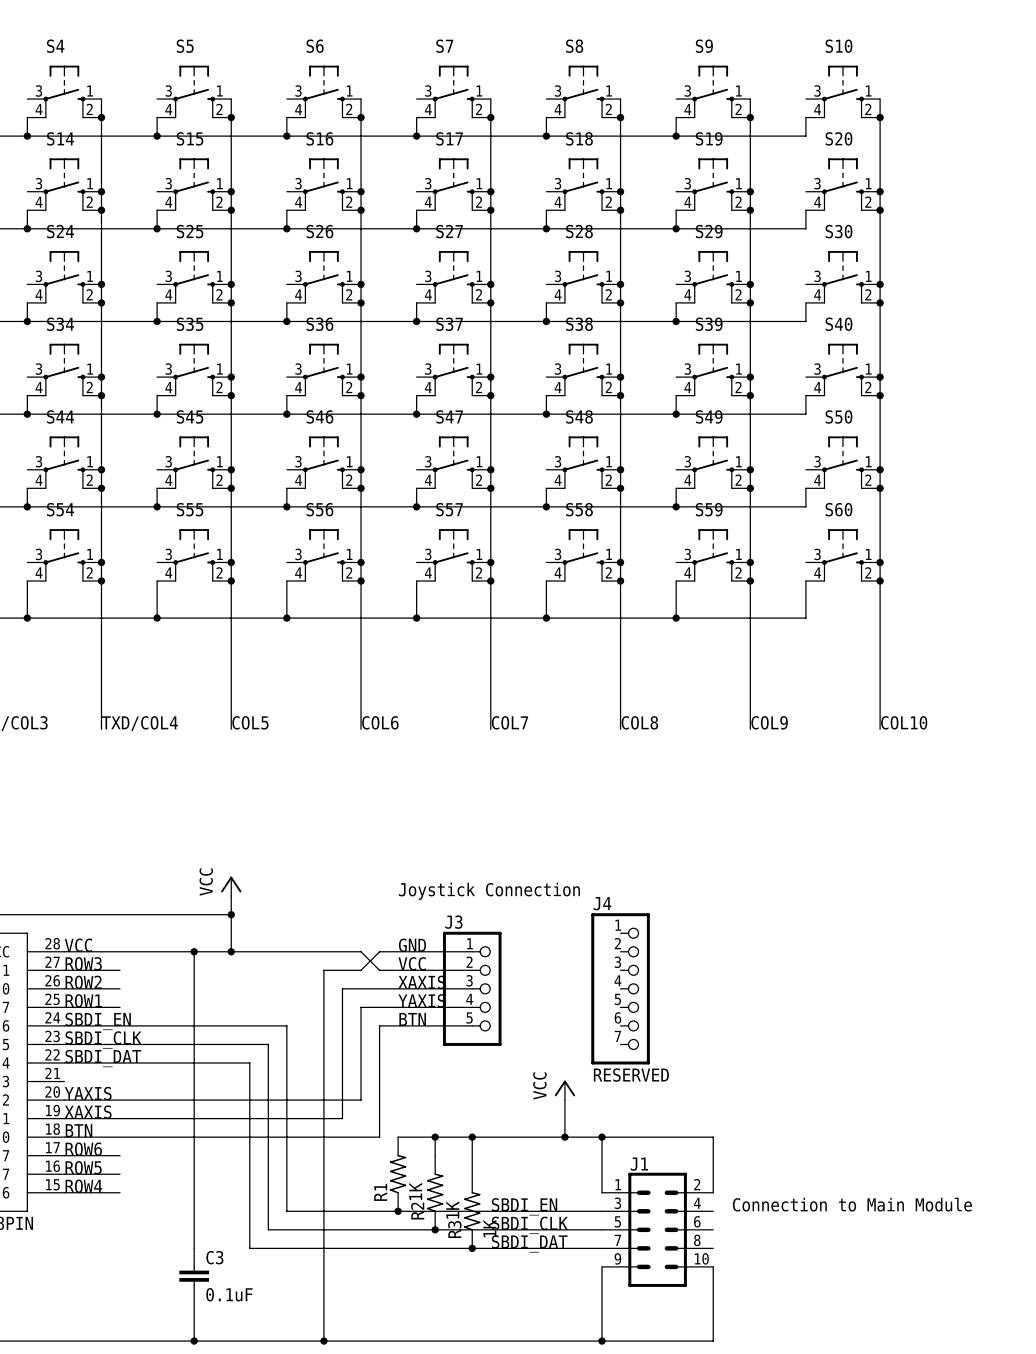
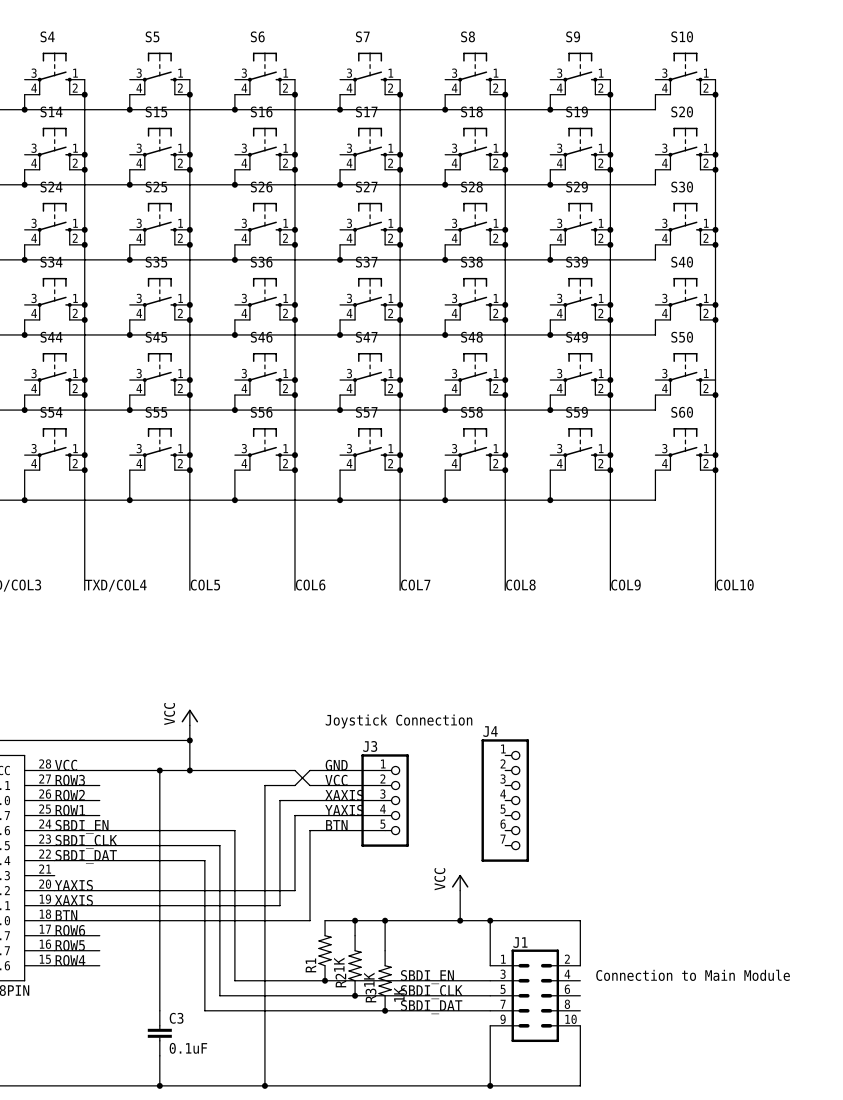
junction: (880, 469) -> none
J4 value: RESERVED (631, 1075) -> none

